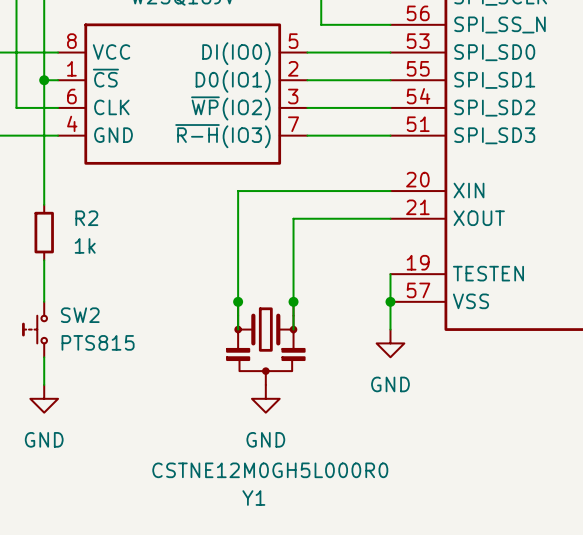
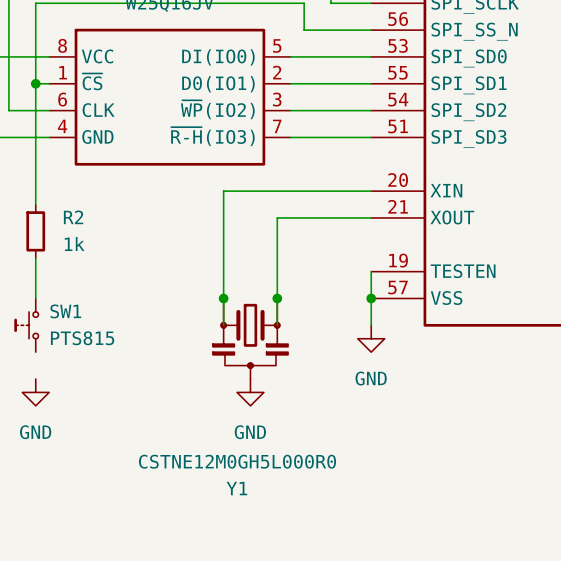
SW2 name: SW2 (80, 315) -> SW1 (65, 311)
wire: (44, 357) (44, 384) -> none

